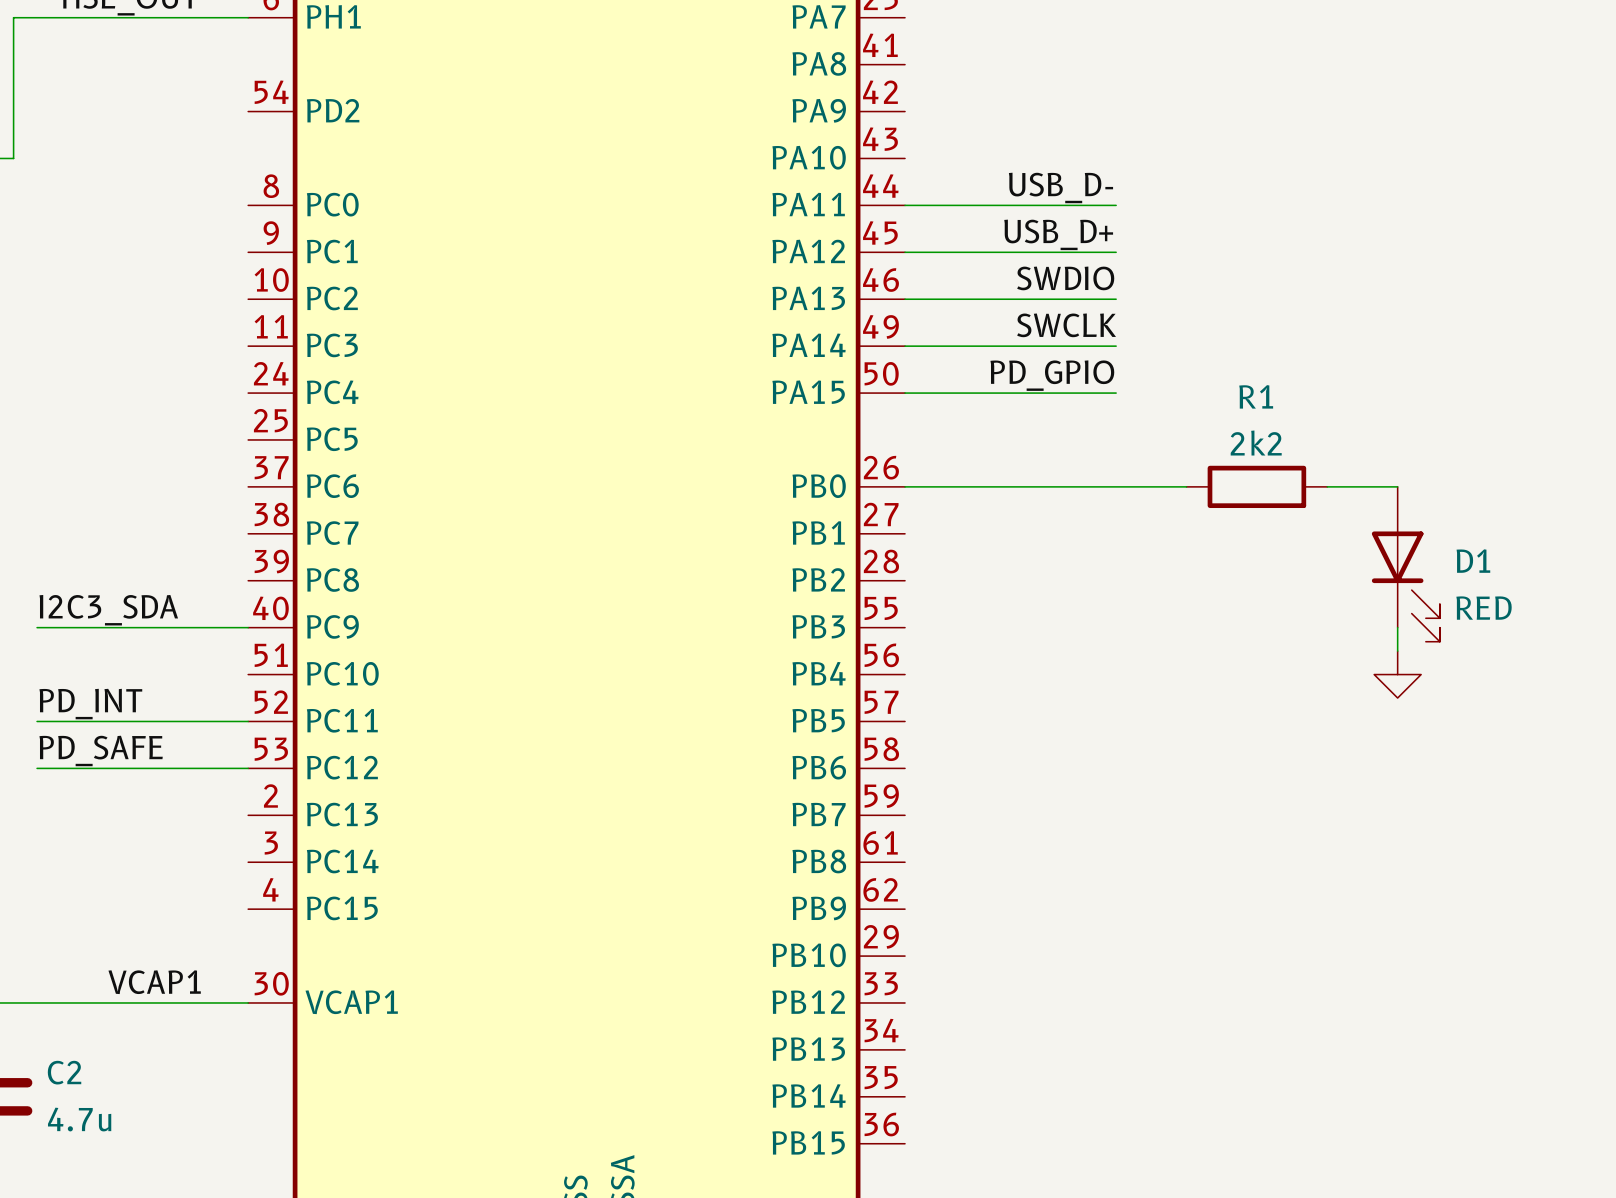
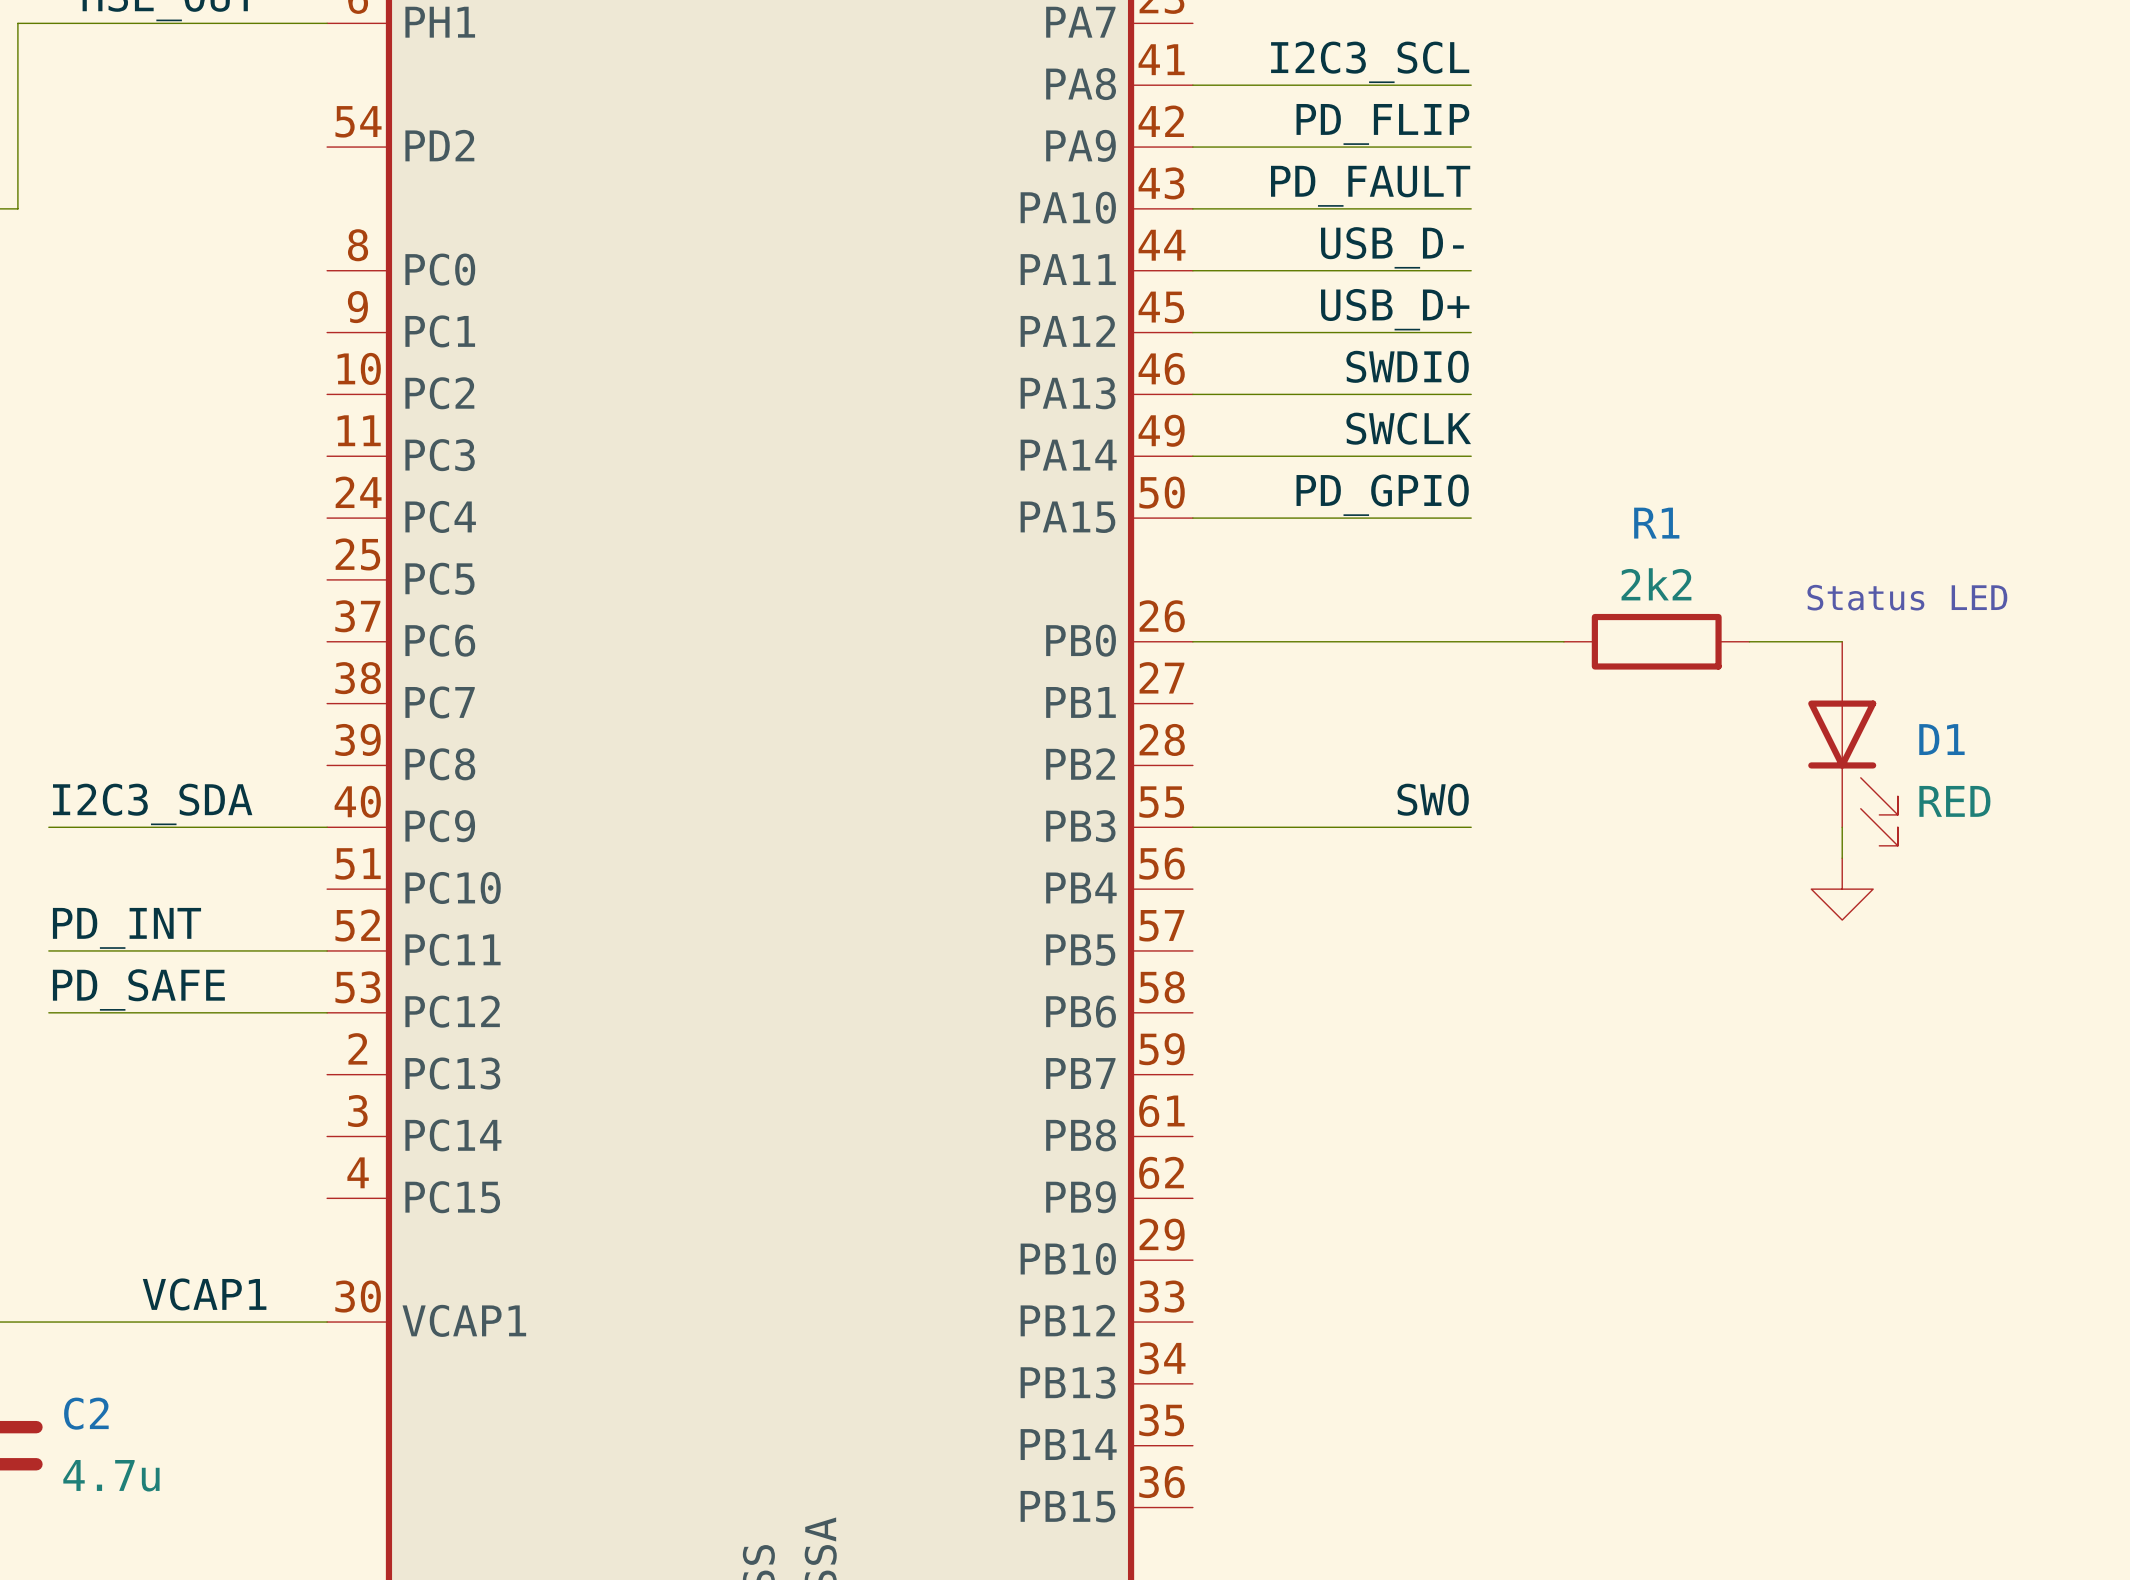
label: none -> I2C3_SCL (1370, 62)
wire: none -> (1192, 85) (1471, 85)
label: none -> PD_FLIP (1382, 124)
wire: none -> (1192, 147) (1471, 147)
label: none -> PD_FAULT (1370, 186)
wire: none -> (1192, 208) (1471, 208)
text: none -> Status LED (1907, 597)
label: none -> SWO (1433, 799)
wire: none -> (1192, 827) (1471, 827)

